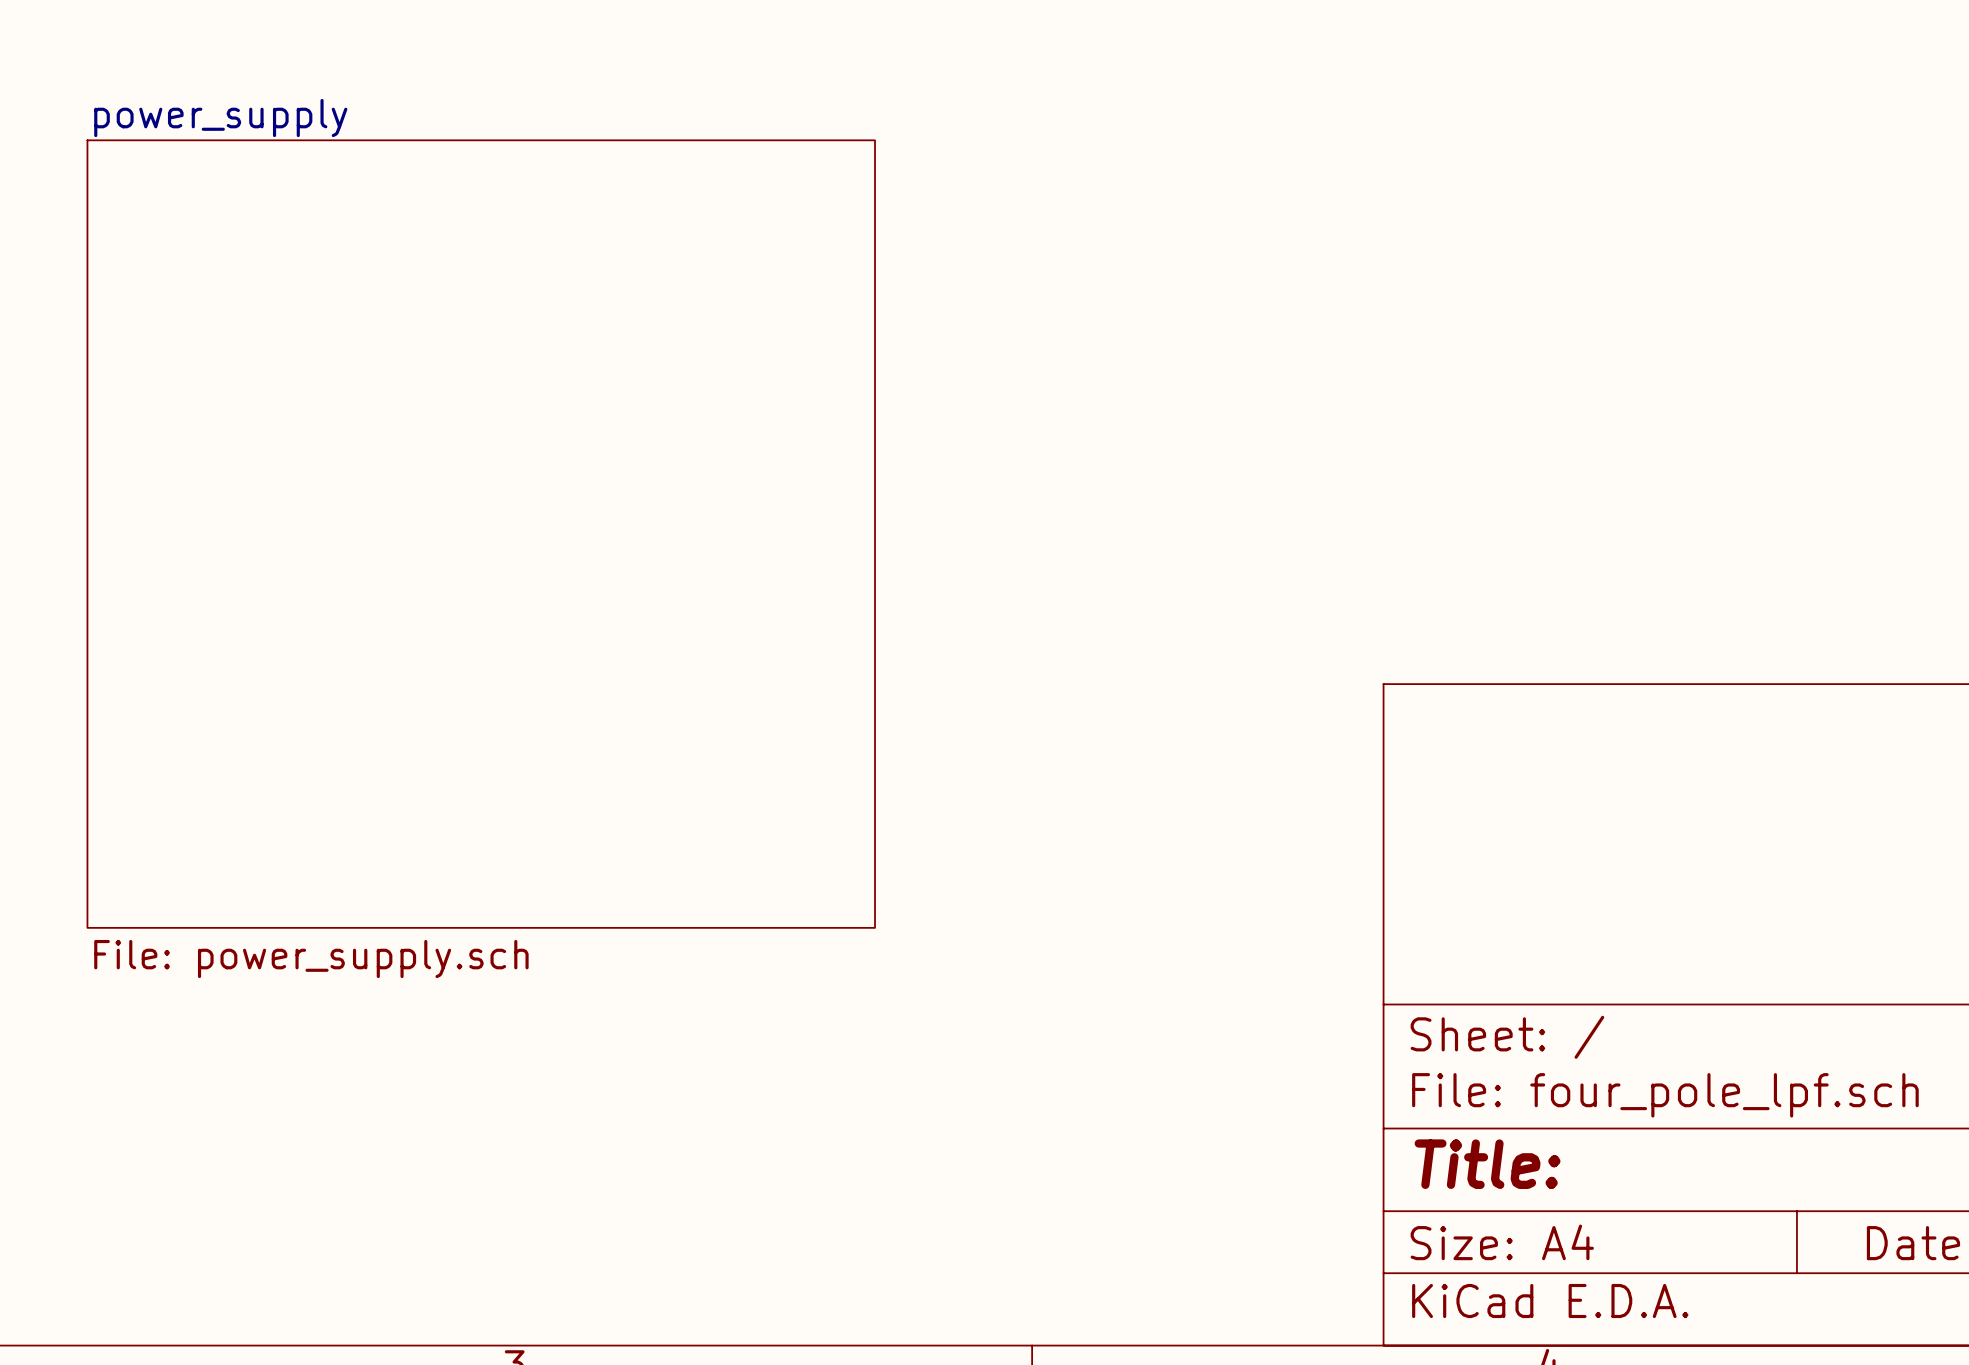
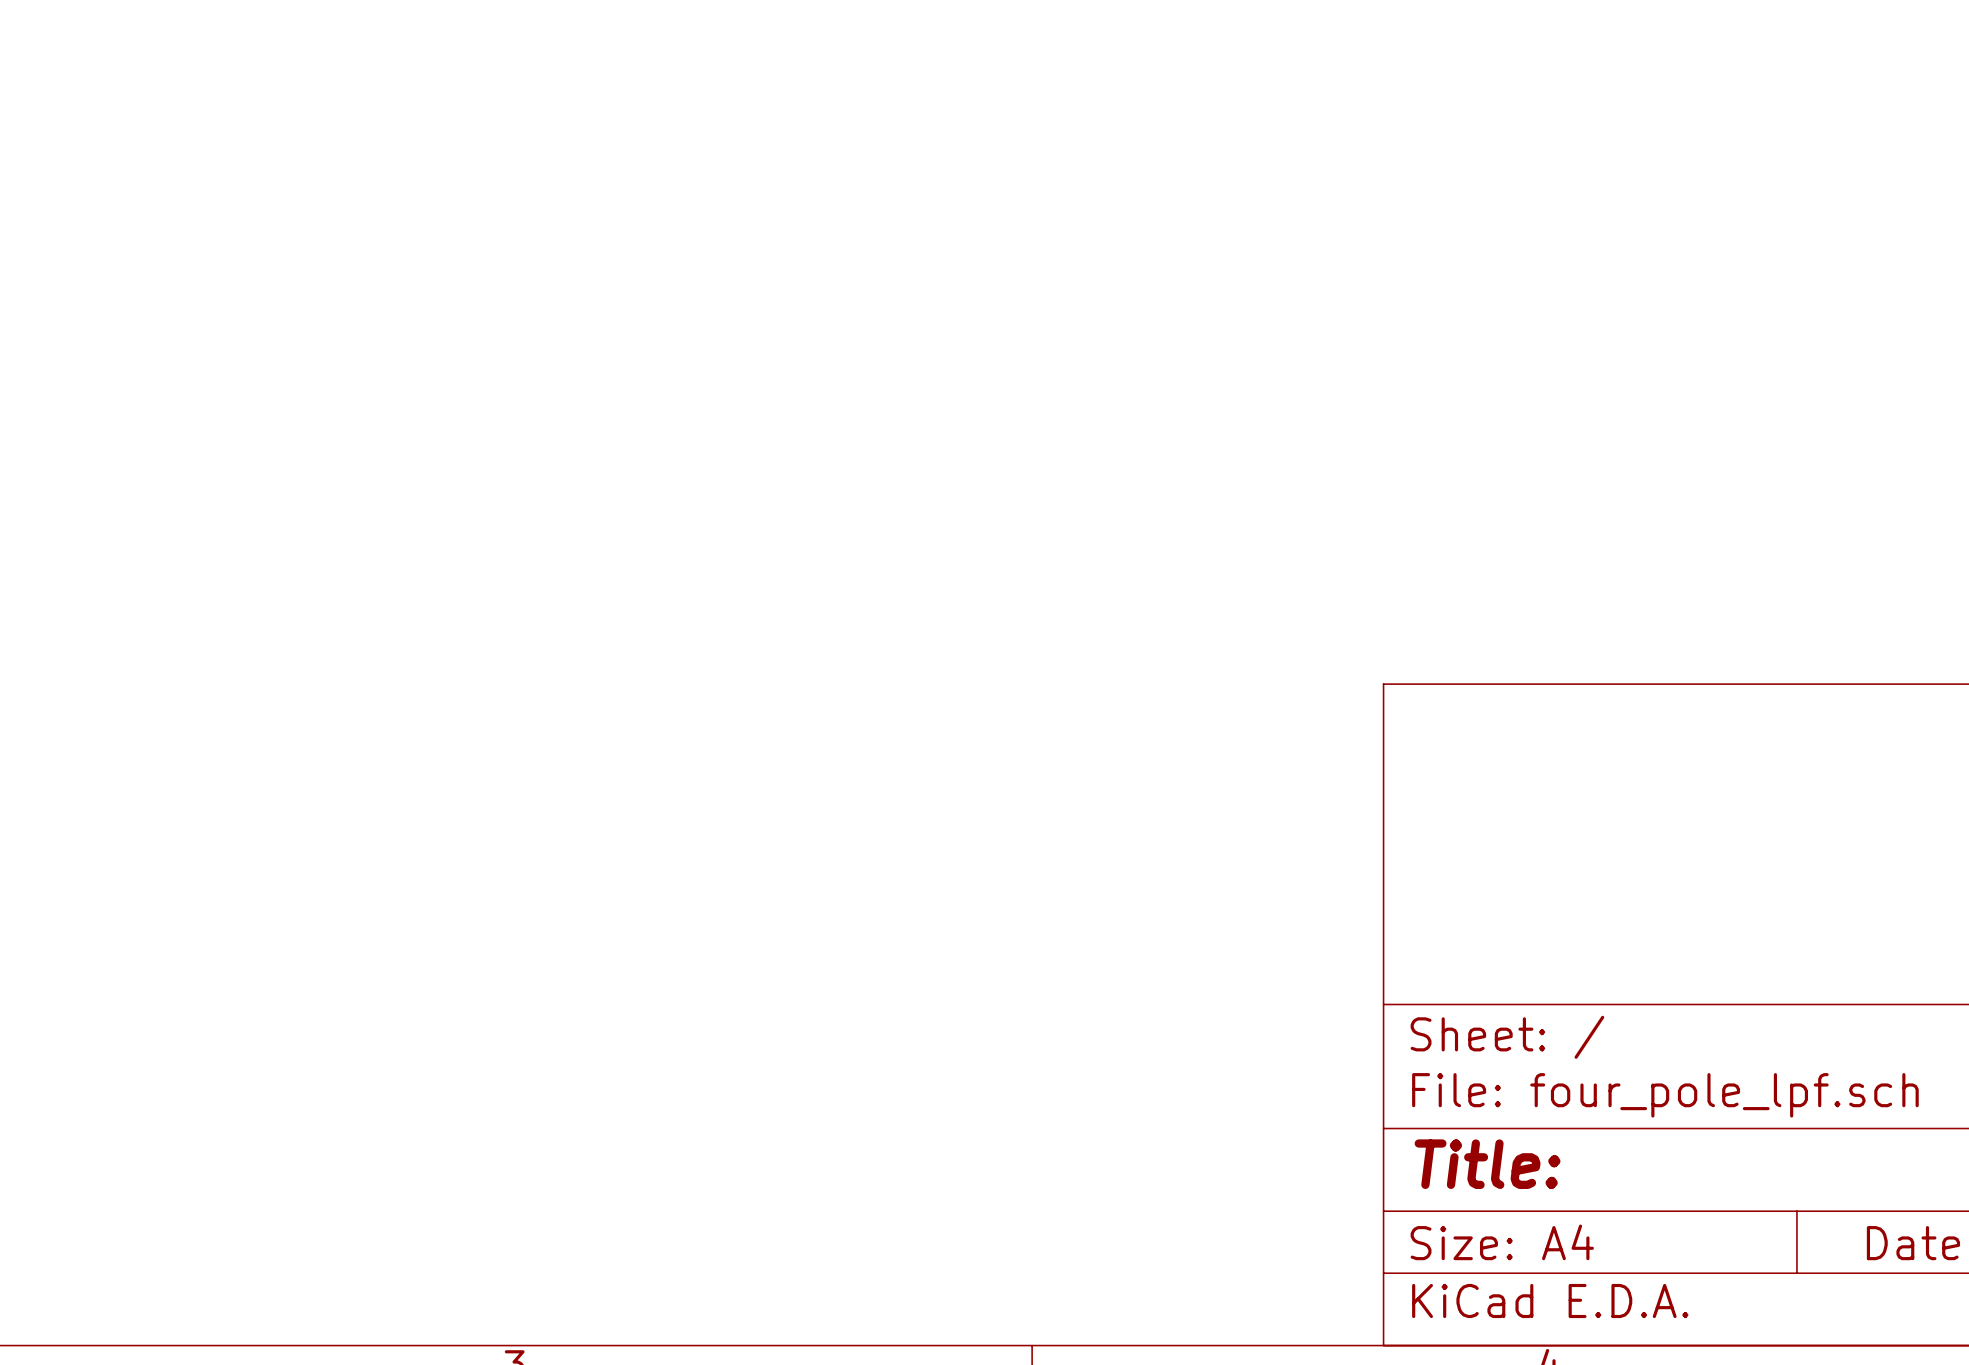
sheet power_supply: File: power_supply.sch (481, 534) -> none

